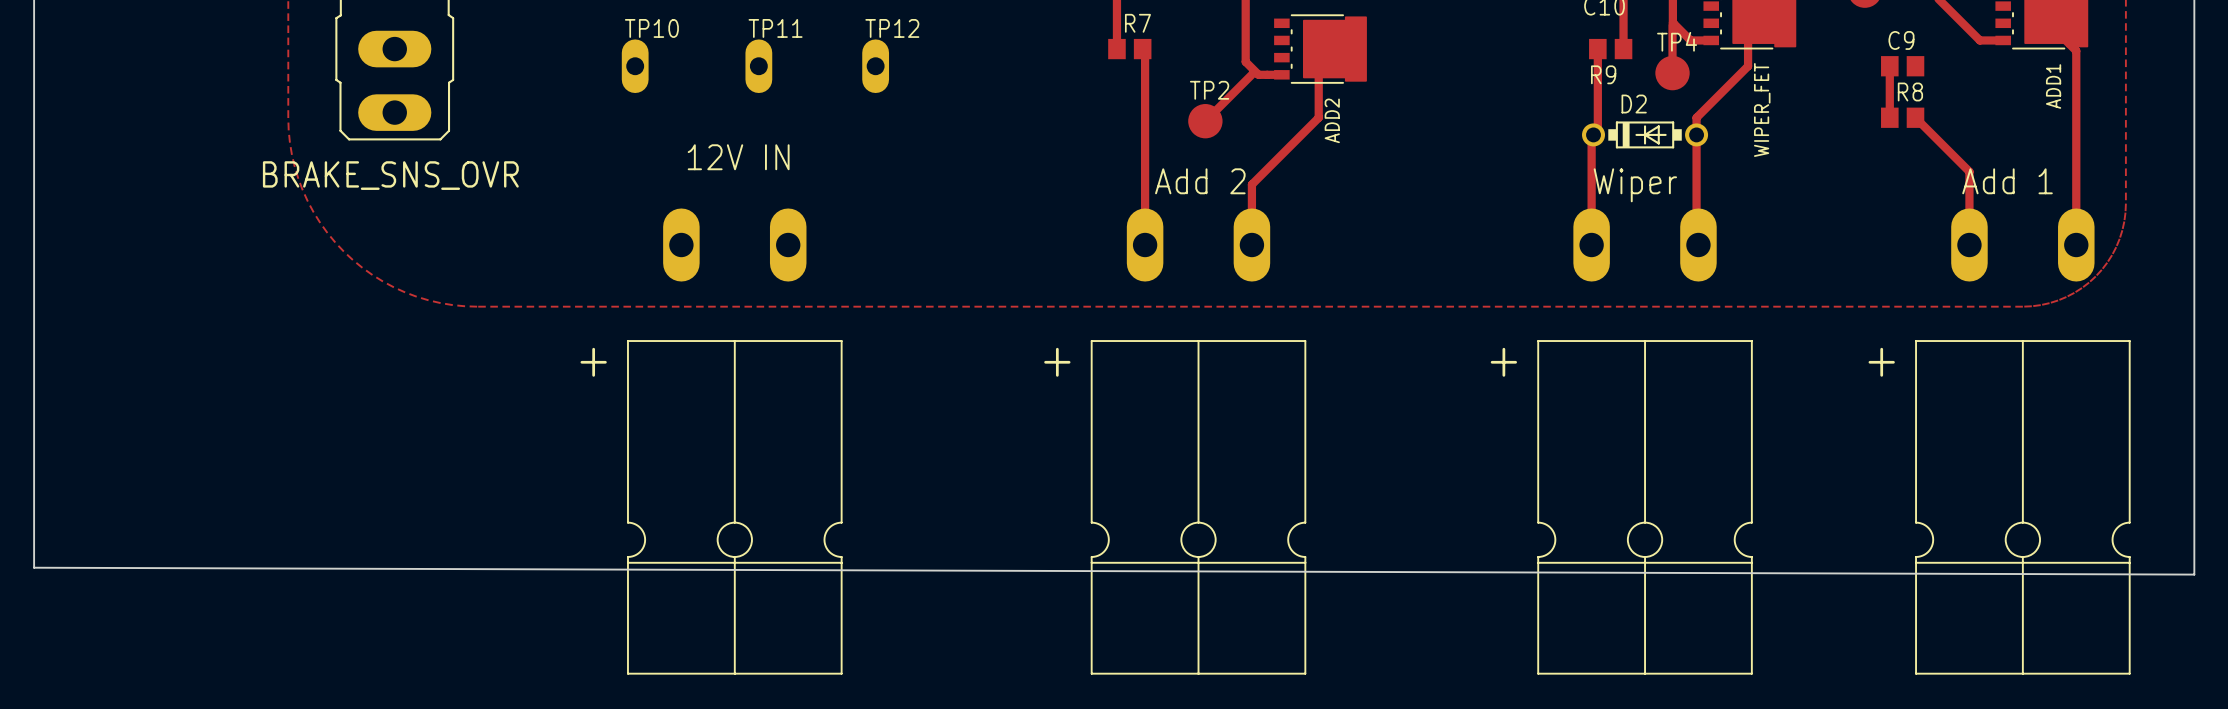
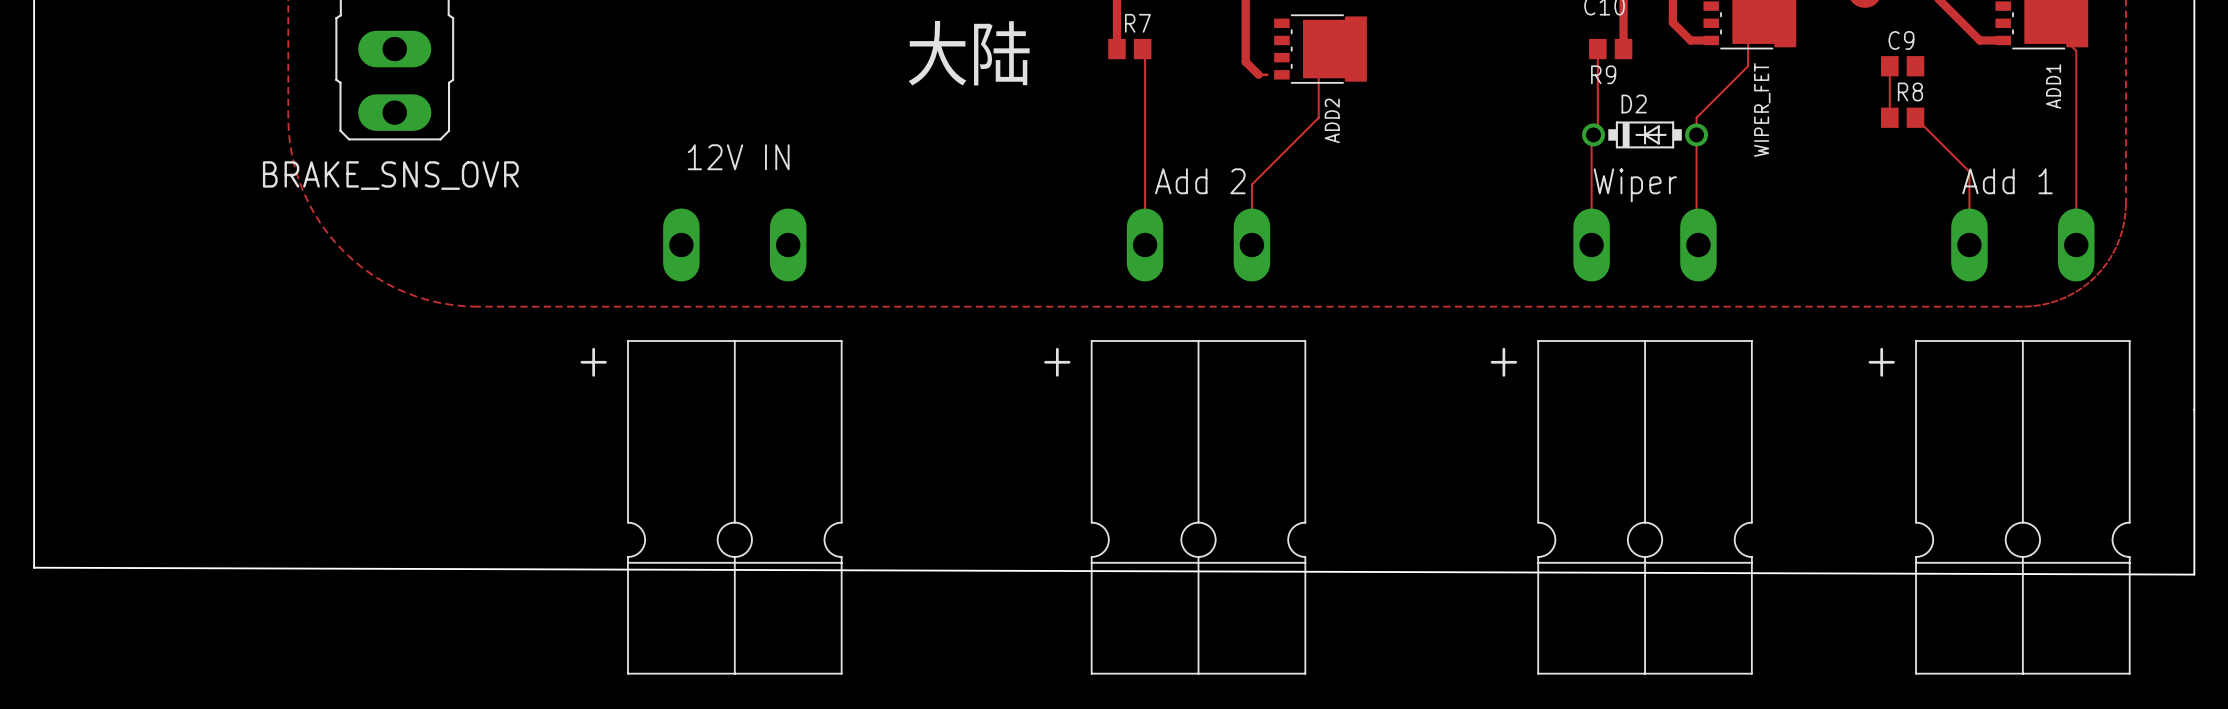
track width: thick (1748, 14) (1748, 66) (1696, 117) (1696, 243) -> thin (1748, 14) (1748, 66) (1696, 117) (1696, 243)
track width: thick (2040, 14) (2076, 50) (2076, 245) -> thin (2040, 14) (2076, 50) (2076, 245)
track: (1673, 23) (1672, 73) -> none
track width: thick (1318, 49) (1318, 117) (1251, 184) (1251, 245) -> thin (1318, 49) (1318, 117) (1251, 184) (1251, 245)
track width: thick (1597, 49) (1597, 130) -> thin (1597, 49) (1597, 130)
track width: thick (1145, 51) (1145, 245) -> thin (1145, 51) (1145, 245)
text: none -> 大陆 (969, 53)
TP10: (635, 66) -> none
TP11: (758, 66) -> none
TP12: (875, 66) -> none
track width: thick (1889, 66) (1889, 117) -> thin (1889, 66) (1889, 117)
TP4: (1672, 73) -> none
track: (1281, 74) (1251, 74) (1205, 121) -> none
track width: thick (1915, 117) (1969, 171) (1969, 245) -> thin (1915, 117) (1969, 171) (1969, 245)
TP2: (1205, 121) -> none
track width: thick (1593, 134) (1591, 136) (1591, 245) -> thin (1593, 134) (1591, 136) (1591, 245)

